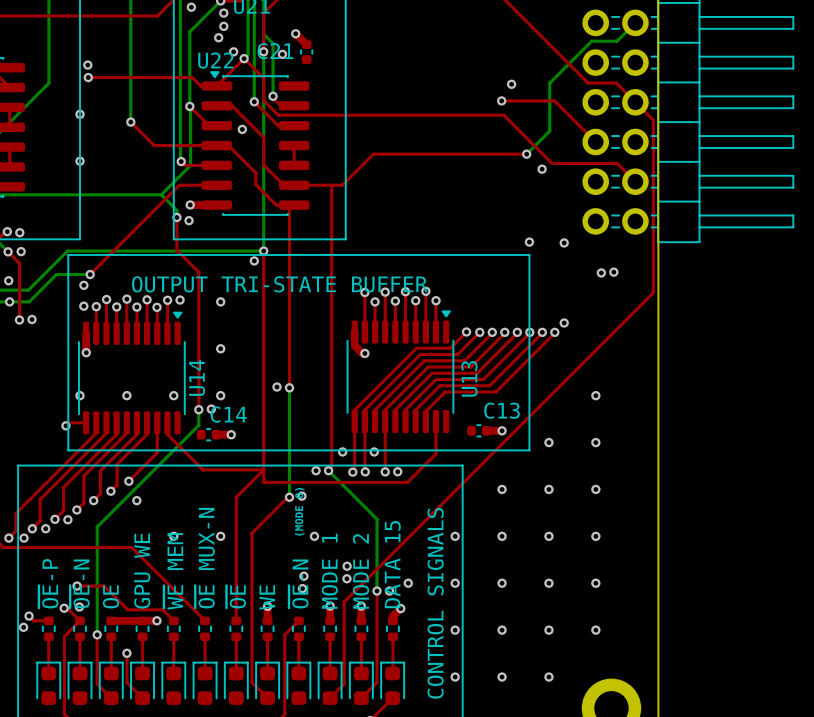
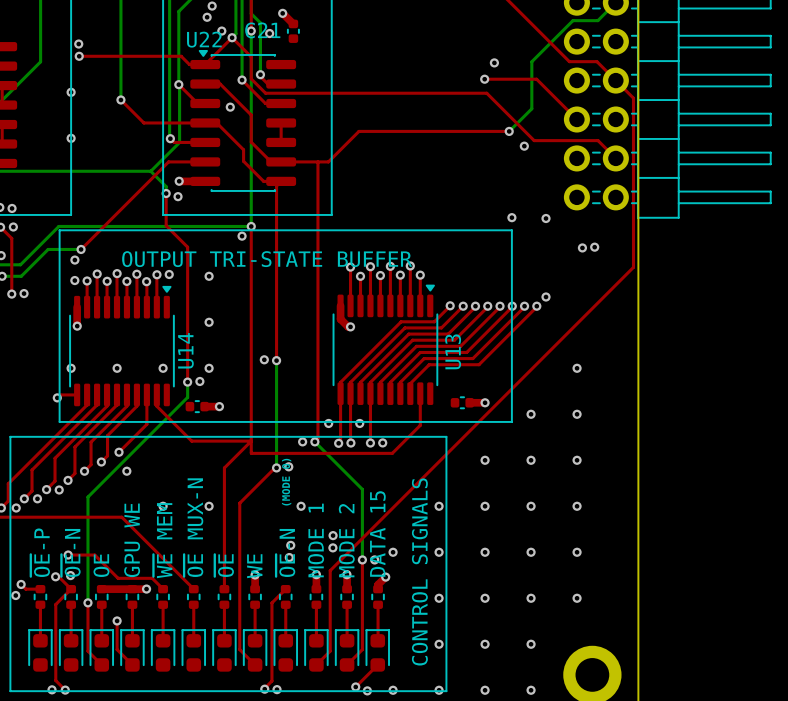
C13 name: C13 (501, 410) -> none
C14 name: C14 (228, 414) -> none

